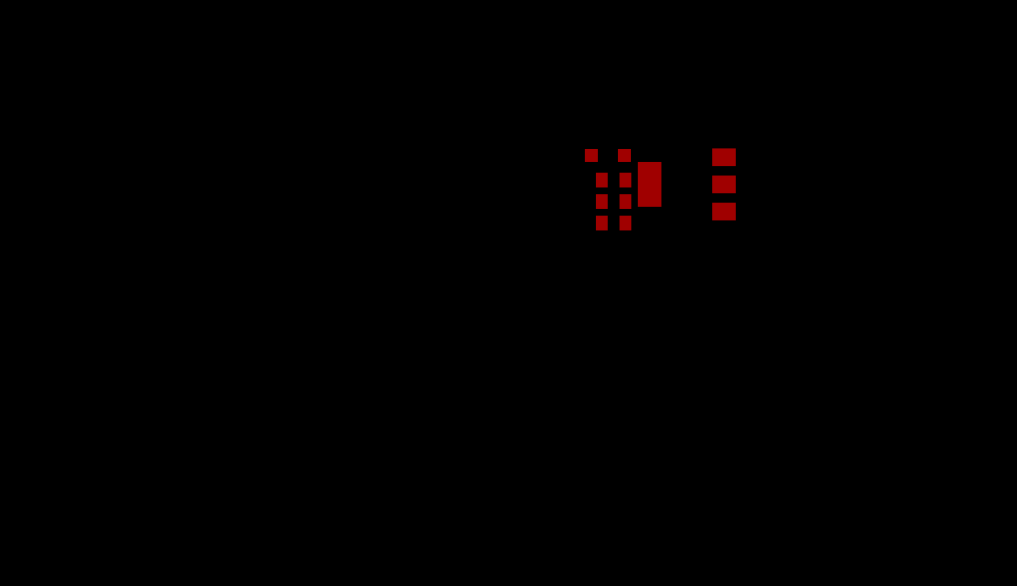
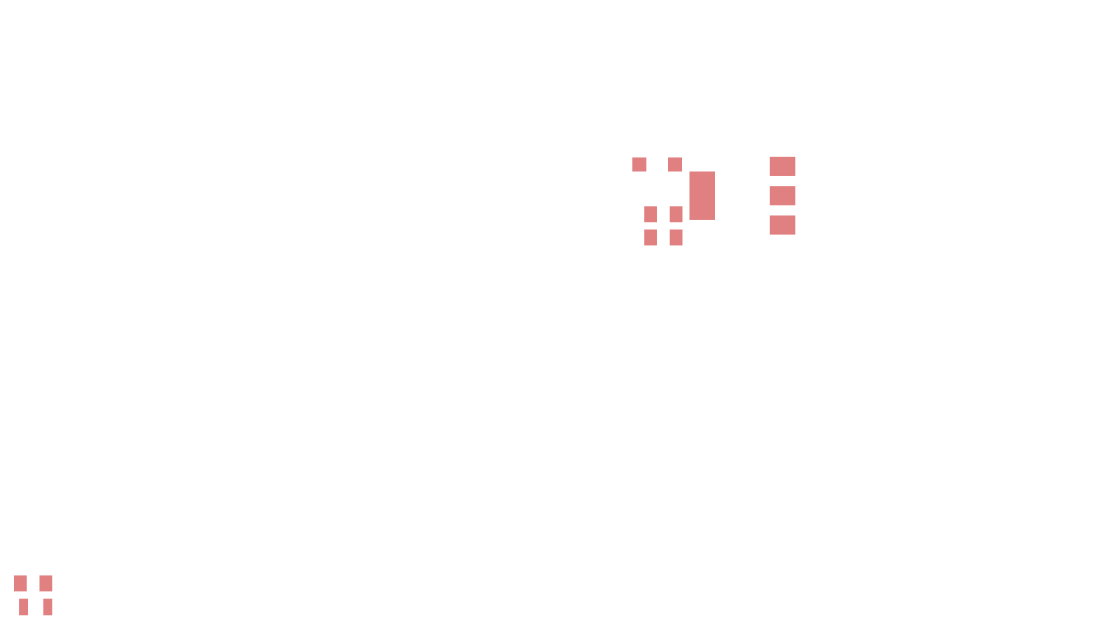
part: (613, 180) -> none
part: none -> (33, 583)
part: none -> (35, 606)

